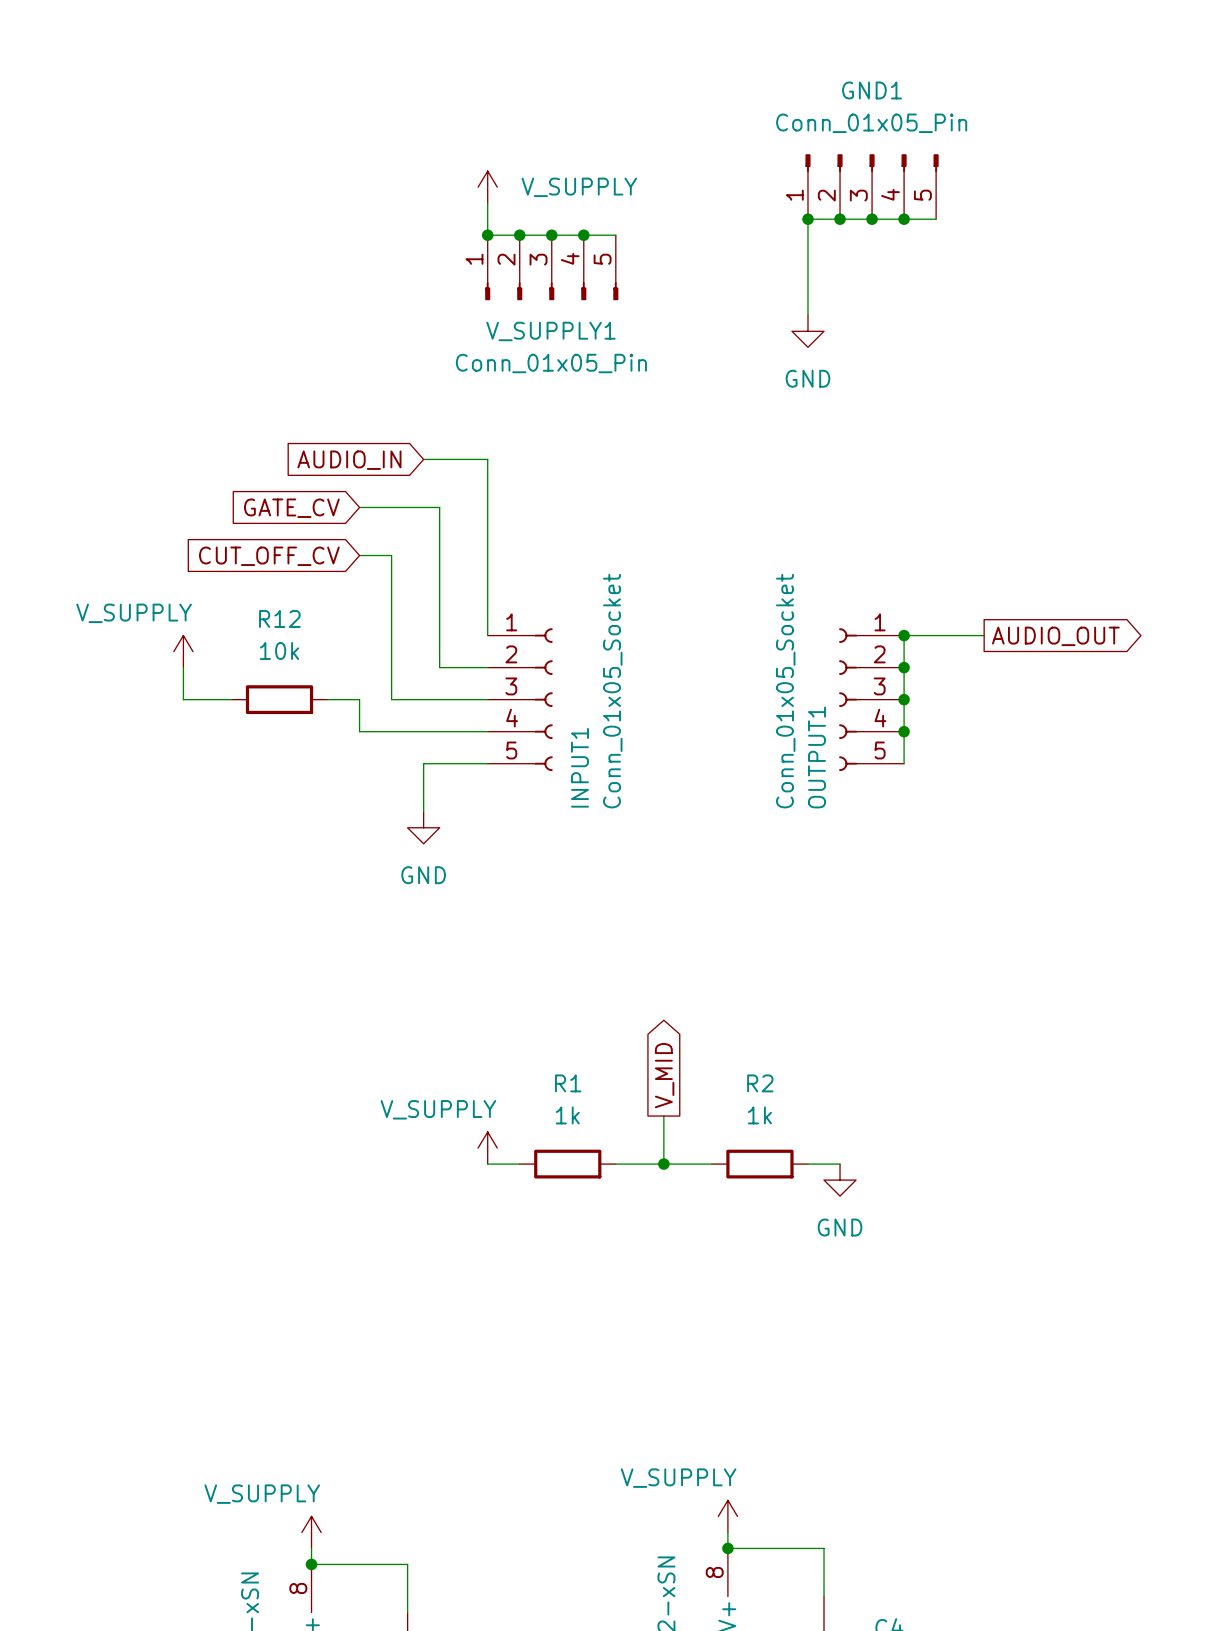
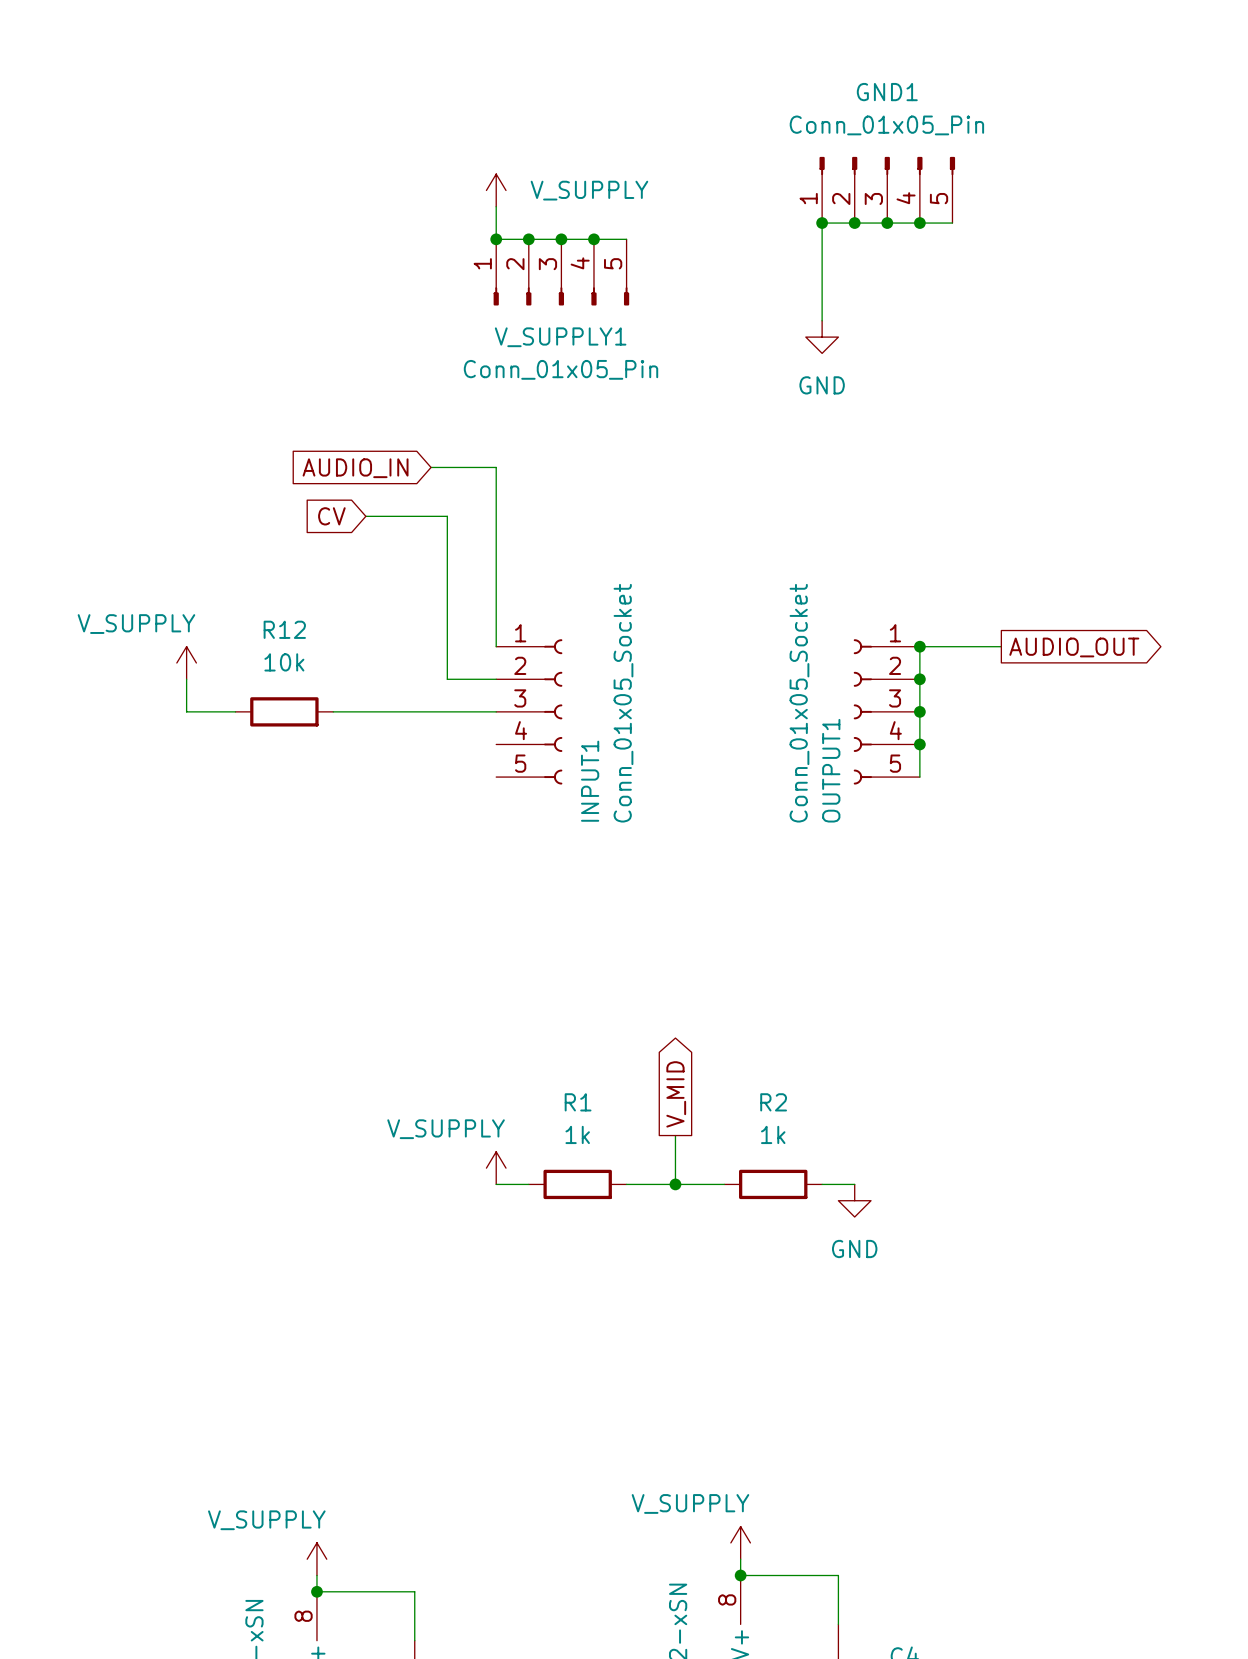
global label: GATE_CV (291, 508) -> CV (331, 516)
wire: (359, 555) (391, 555) (391, 699) -> none
global label: CUT_OFF_CV (269, 556) -> none
wire: (359, 699) (359, 731) (487, 731) -> (365, 711) (398, 711)
wire: (487, 763) (423, 763) (423, 811) -> none
power symbol: GND (423, 827) -> none

